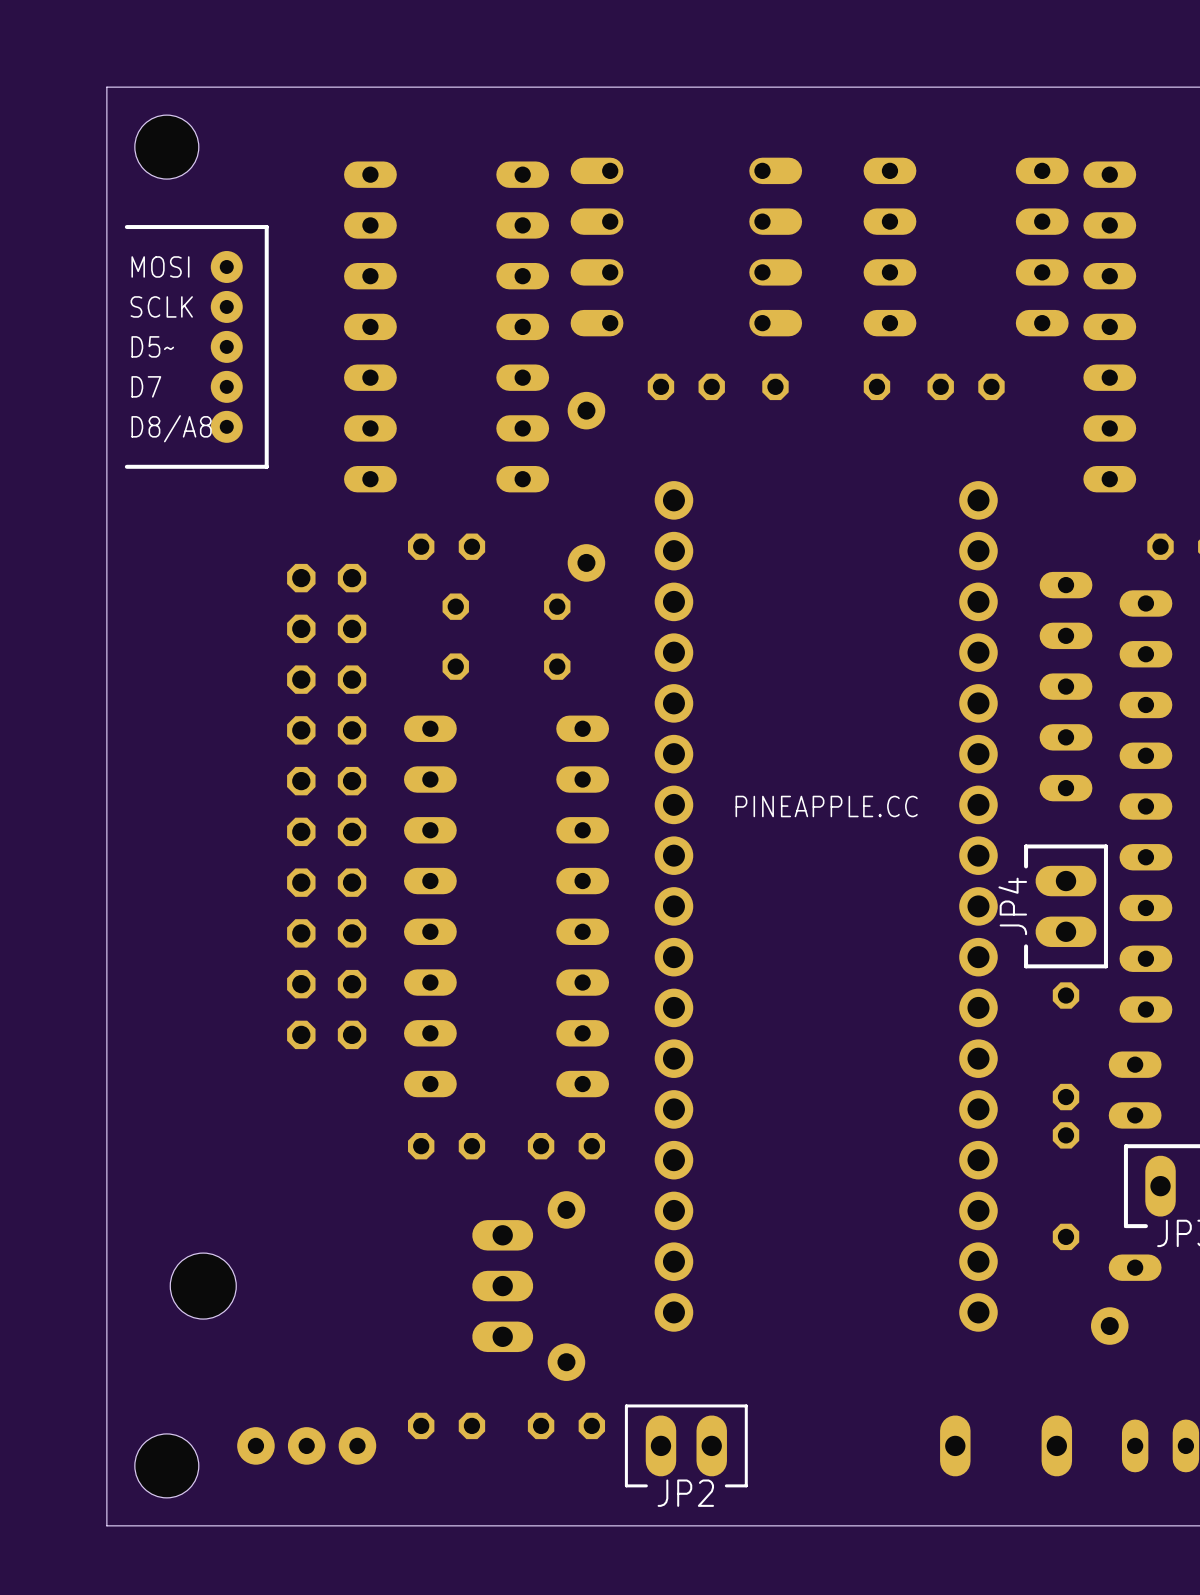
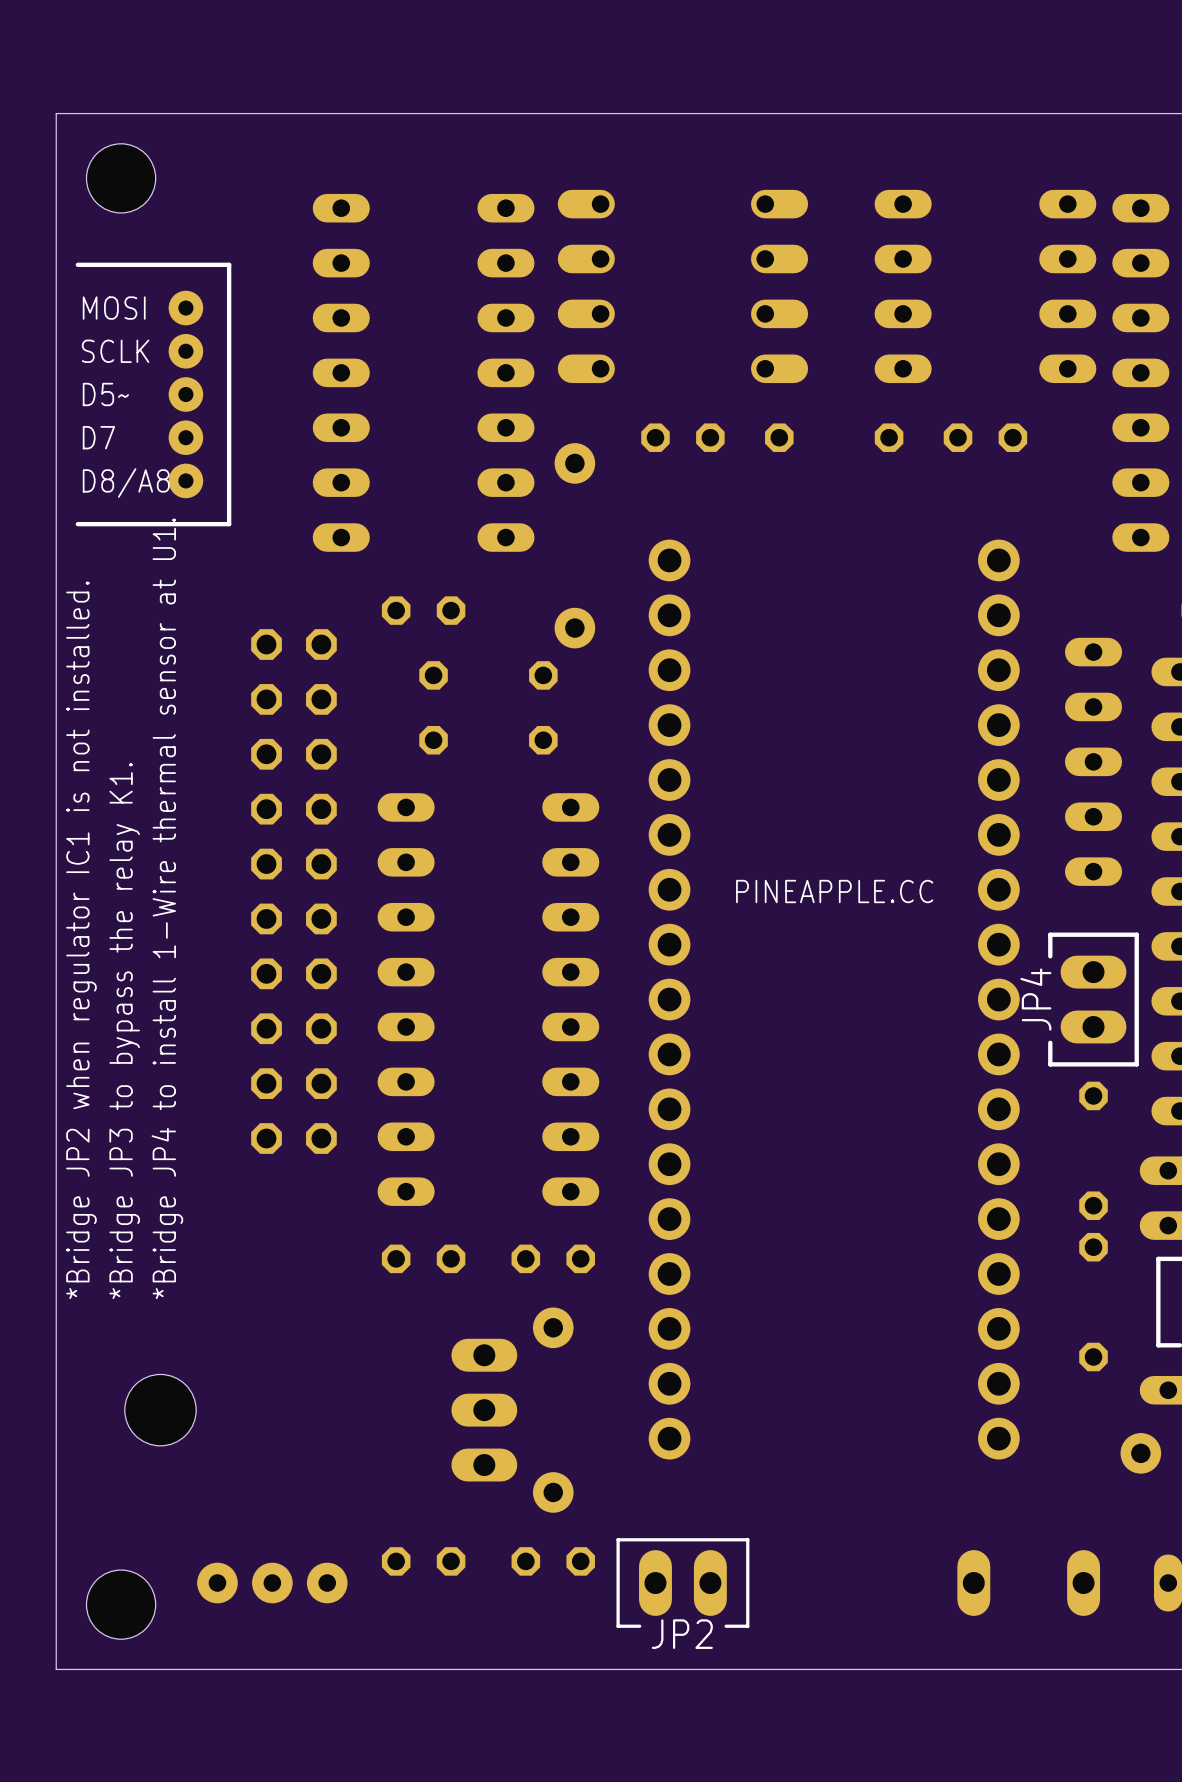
text: none -> *Bridge JP4 to install 1-Wire thermal sensor at U1. (167, 908)
text: none -> *Bridge JP2 when regulator IC1 is not installed. (81, 940)
text: none -> *Bridge JP3 to bypass the relay K1. (124, 1030)

